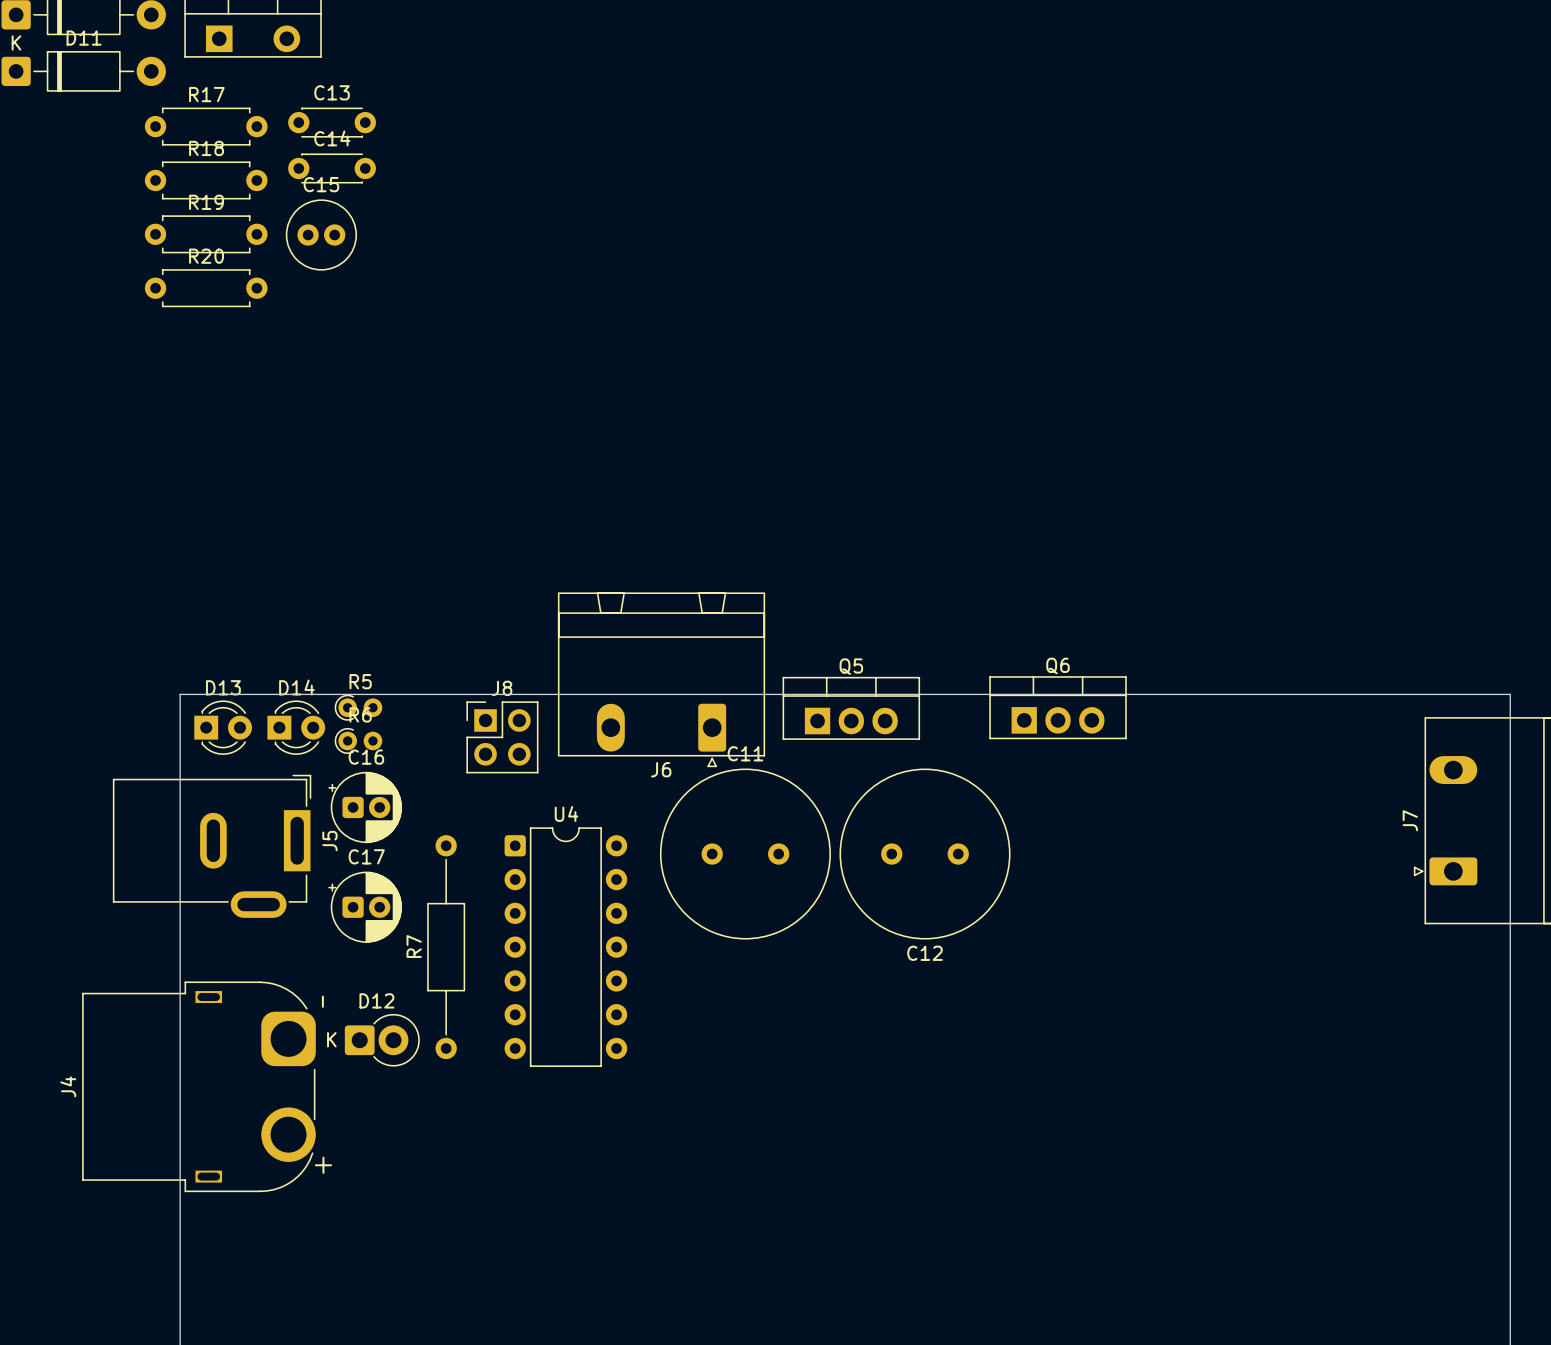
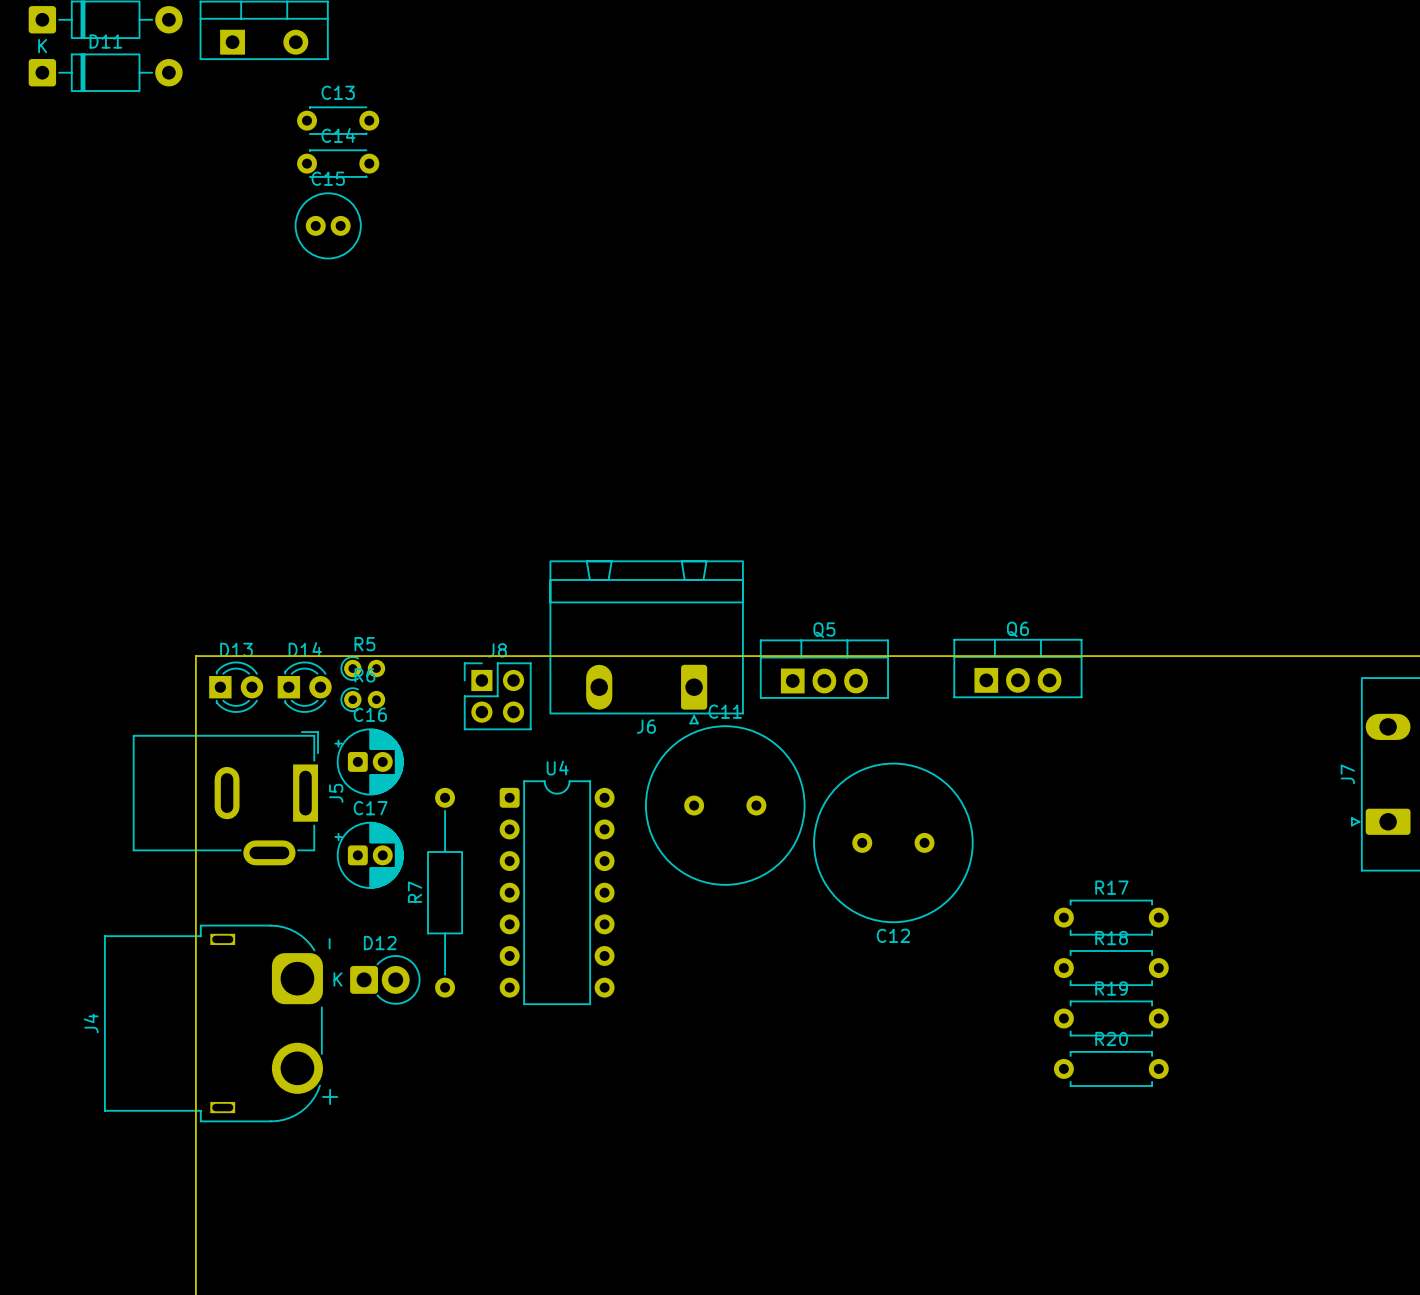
R17 position: (206, 126) -> (1111, 917)
R18 position: (206, 180) -> (1111, 968)
R19 position: (206, 234) -> (1111, 1018)
R20 position: (206, 288) -> (1111, 1068)
C12 position: (925, 854) -> (893, 842)

